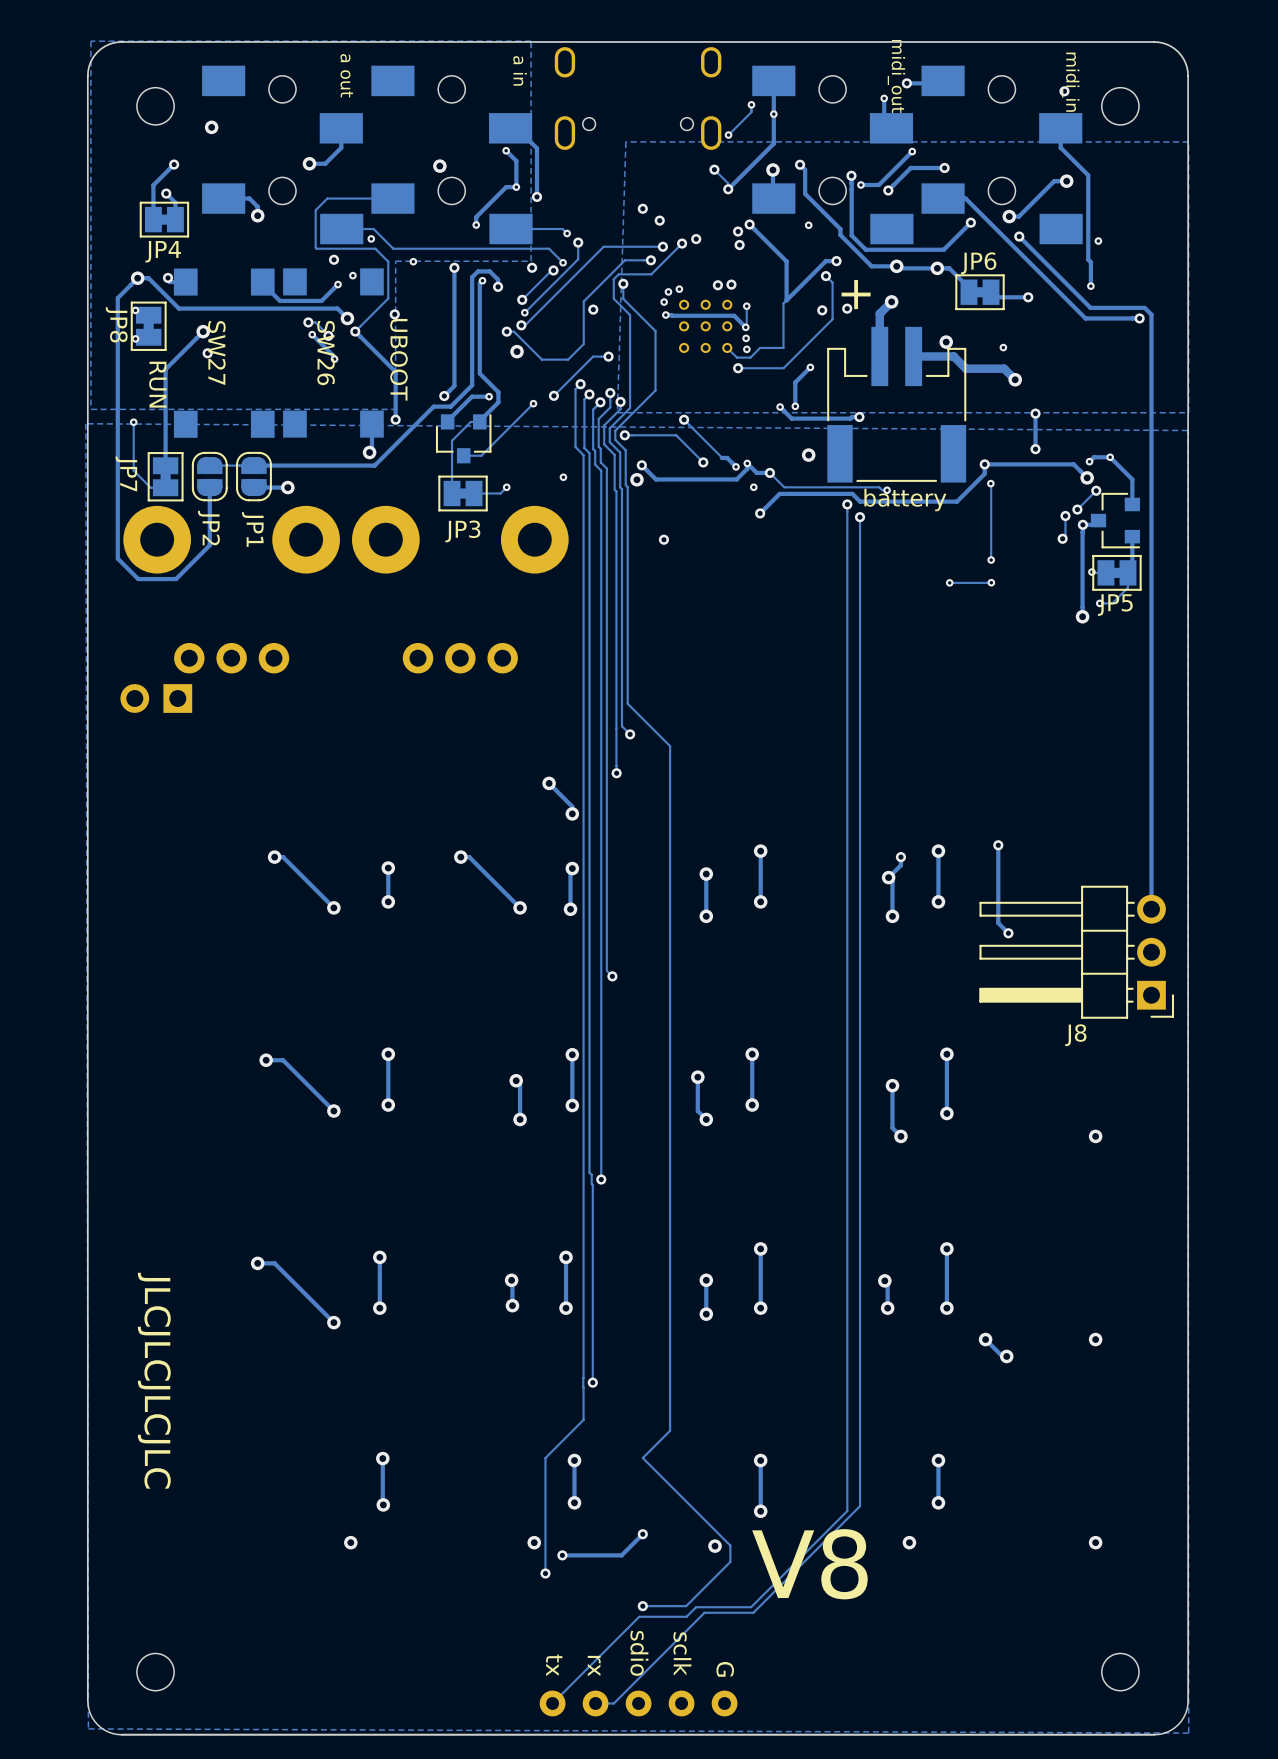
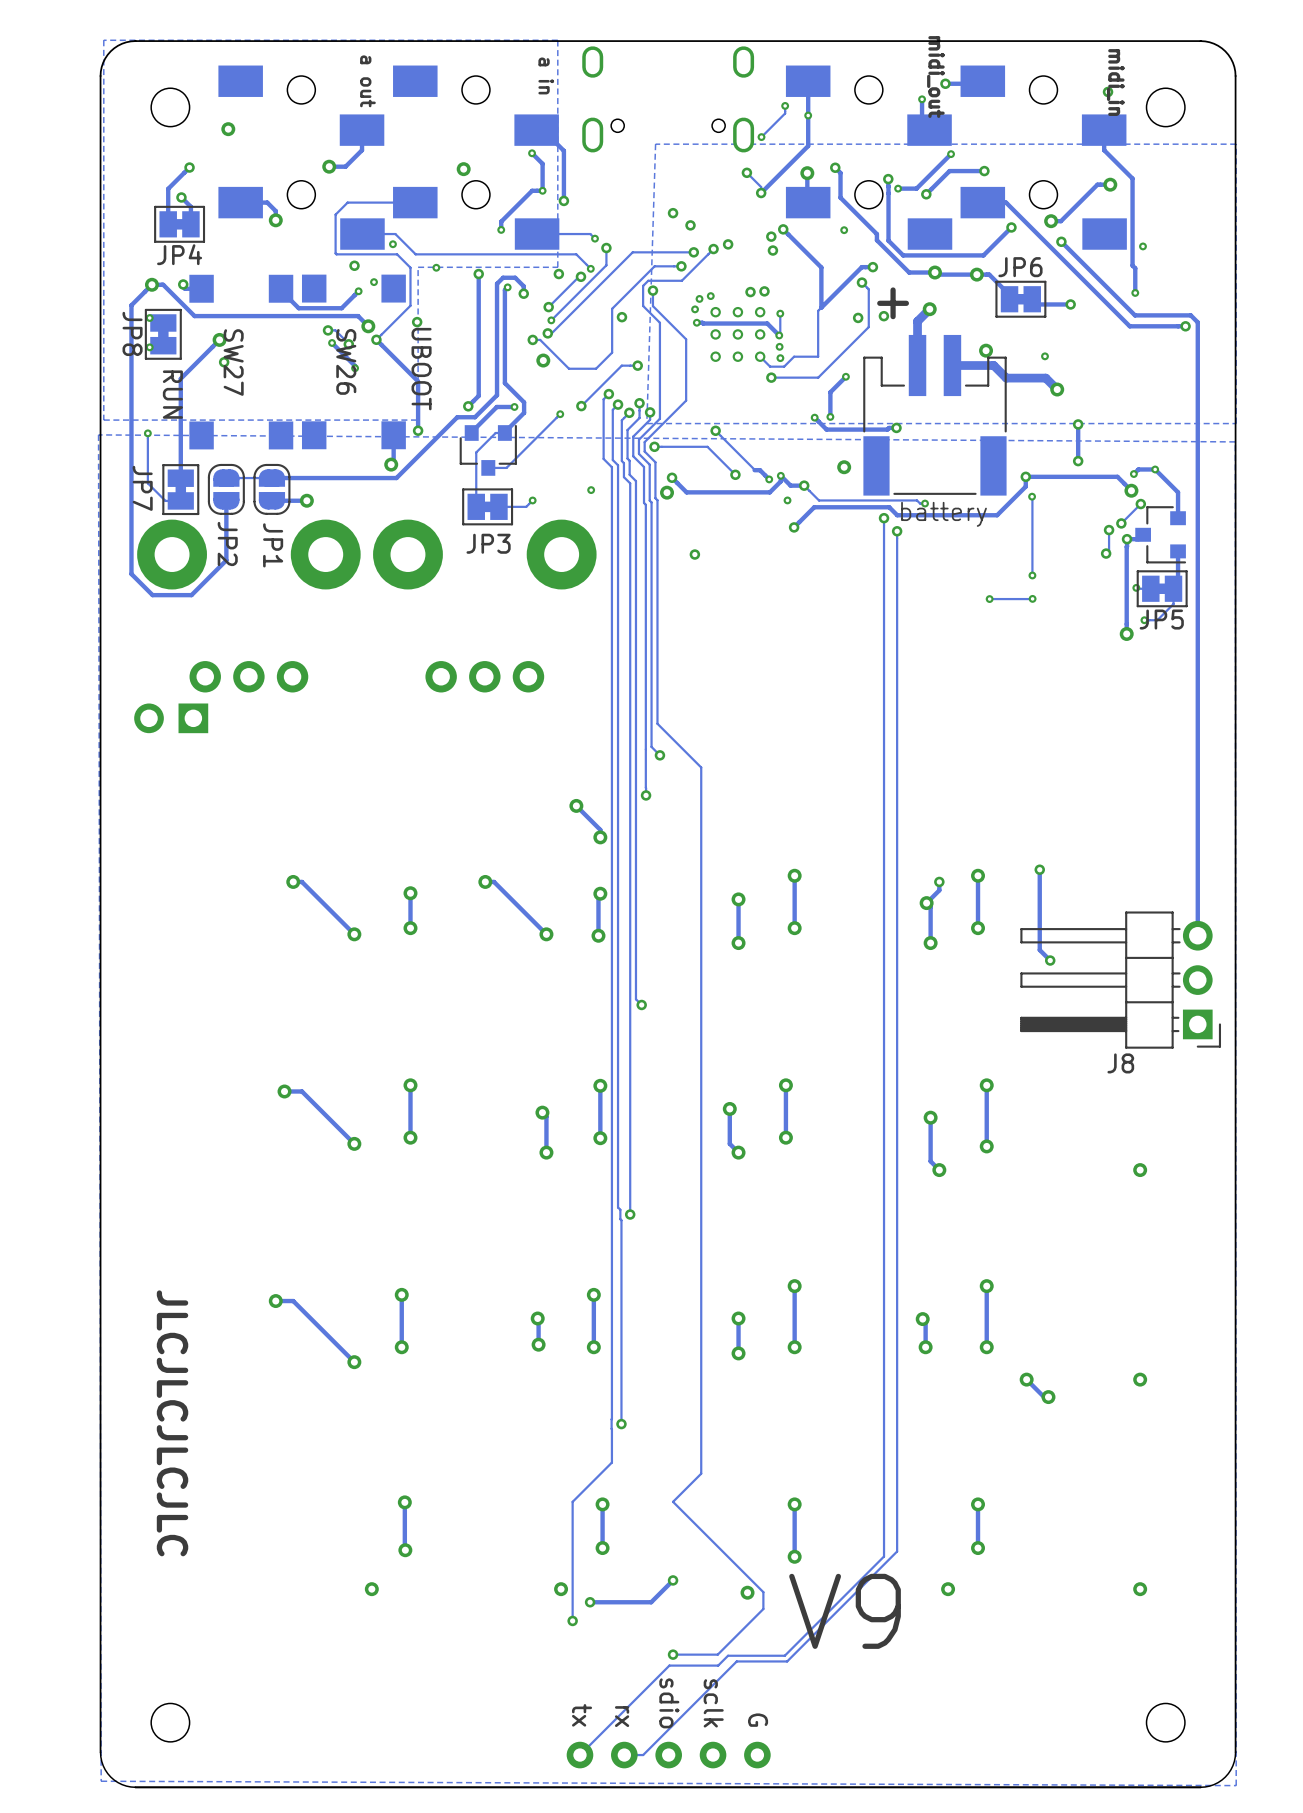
text: V8 (809, 1564) -> V9 (845, 1611)

